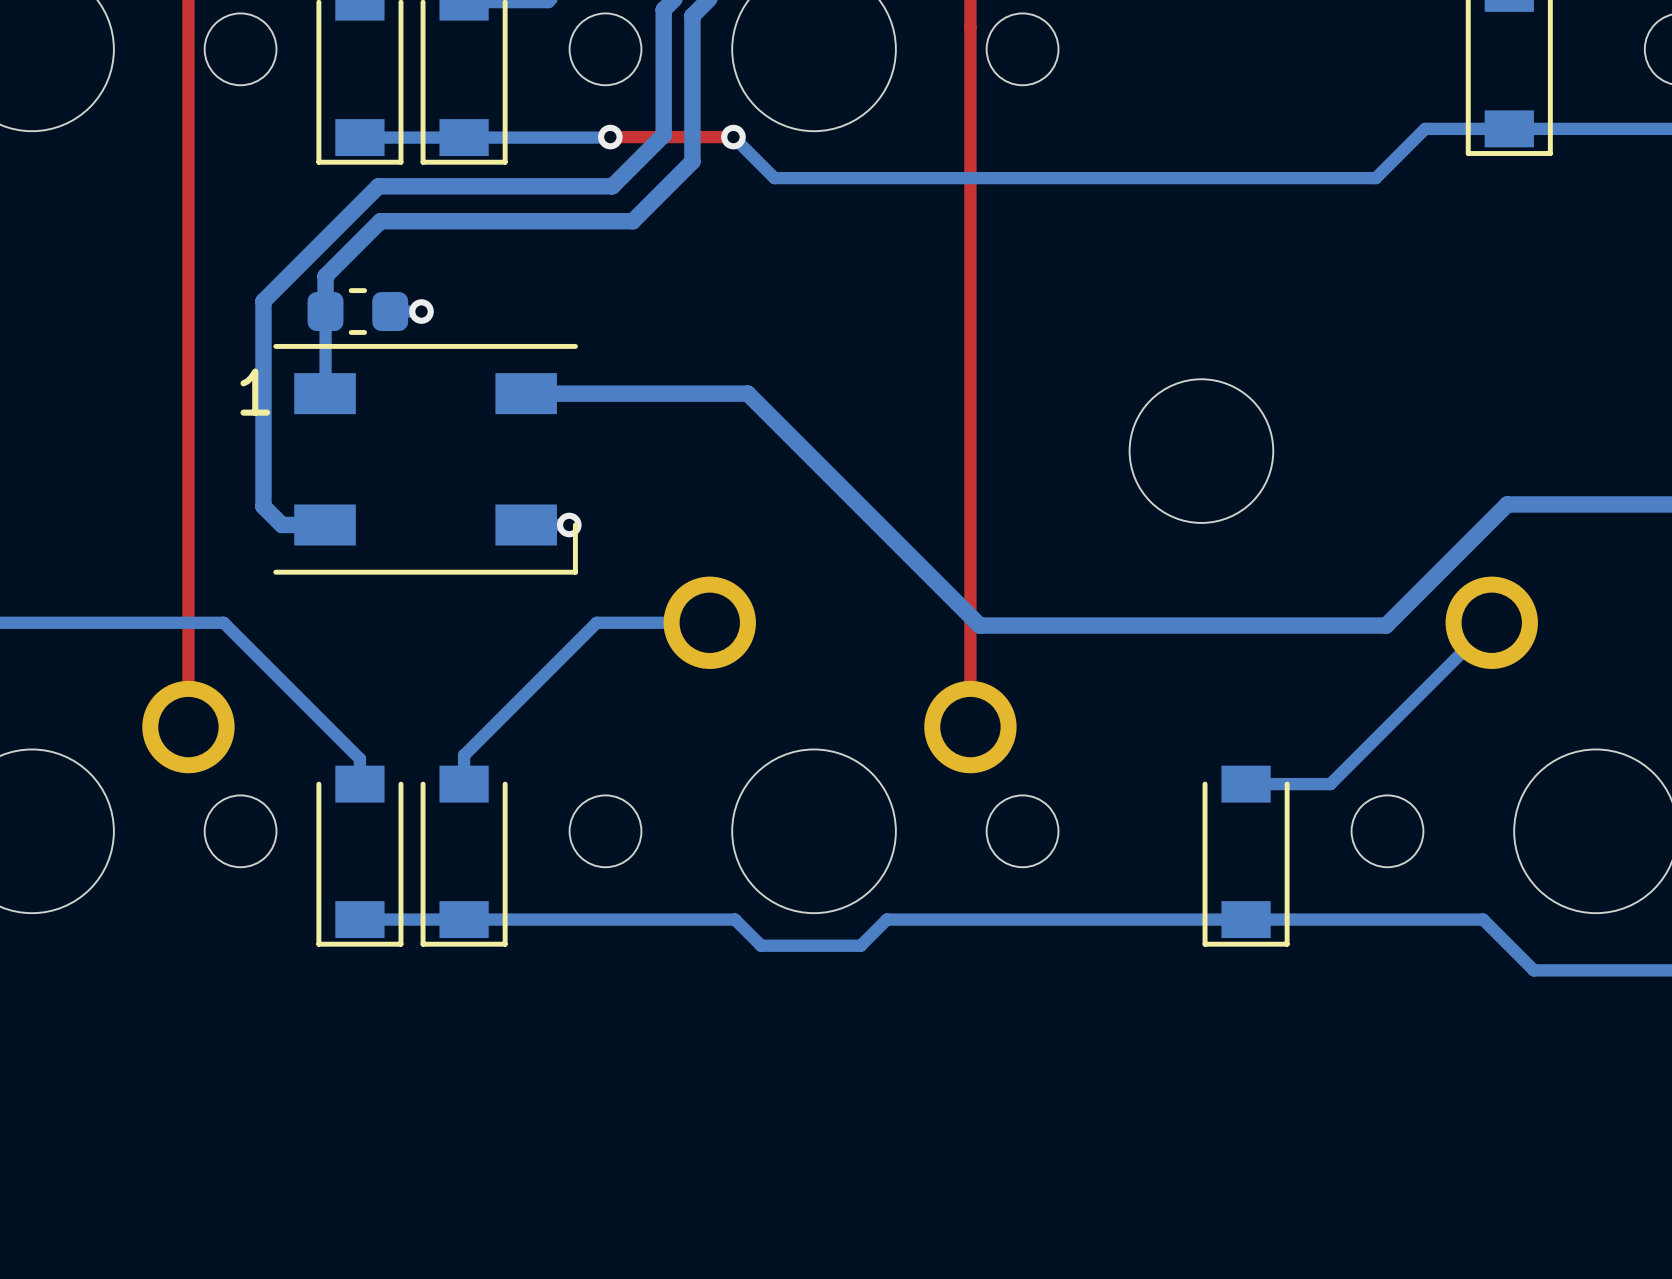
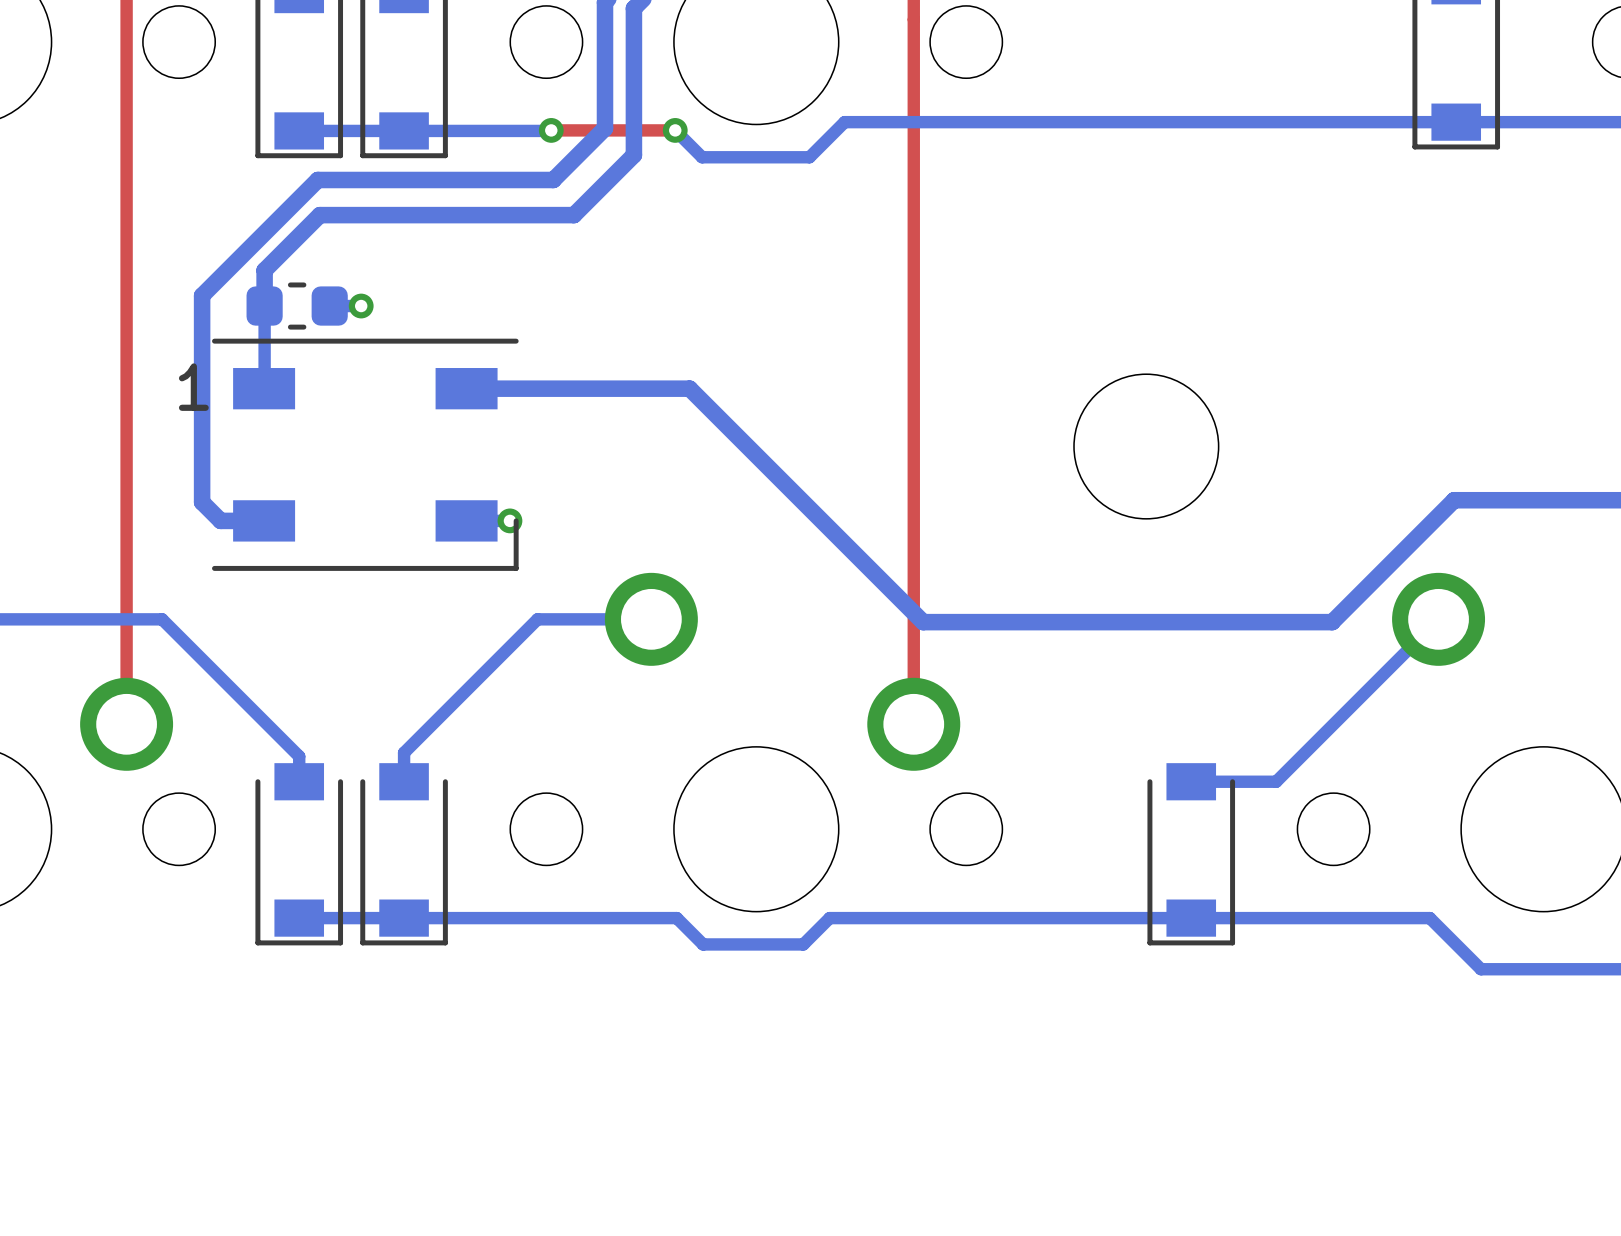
bottom track: (1425, 128) (1375, 178) (774, 178) (760, 163) -> (1371, 122) (844, 122) (809, 157) (702, 157)

